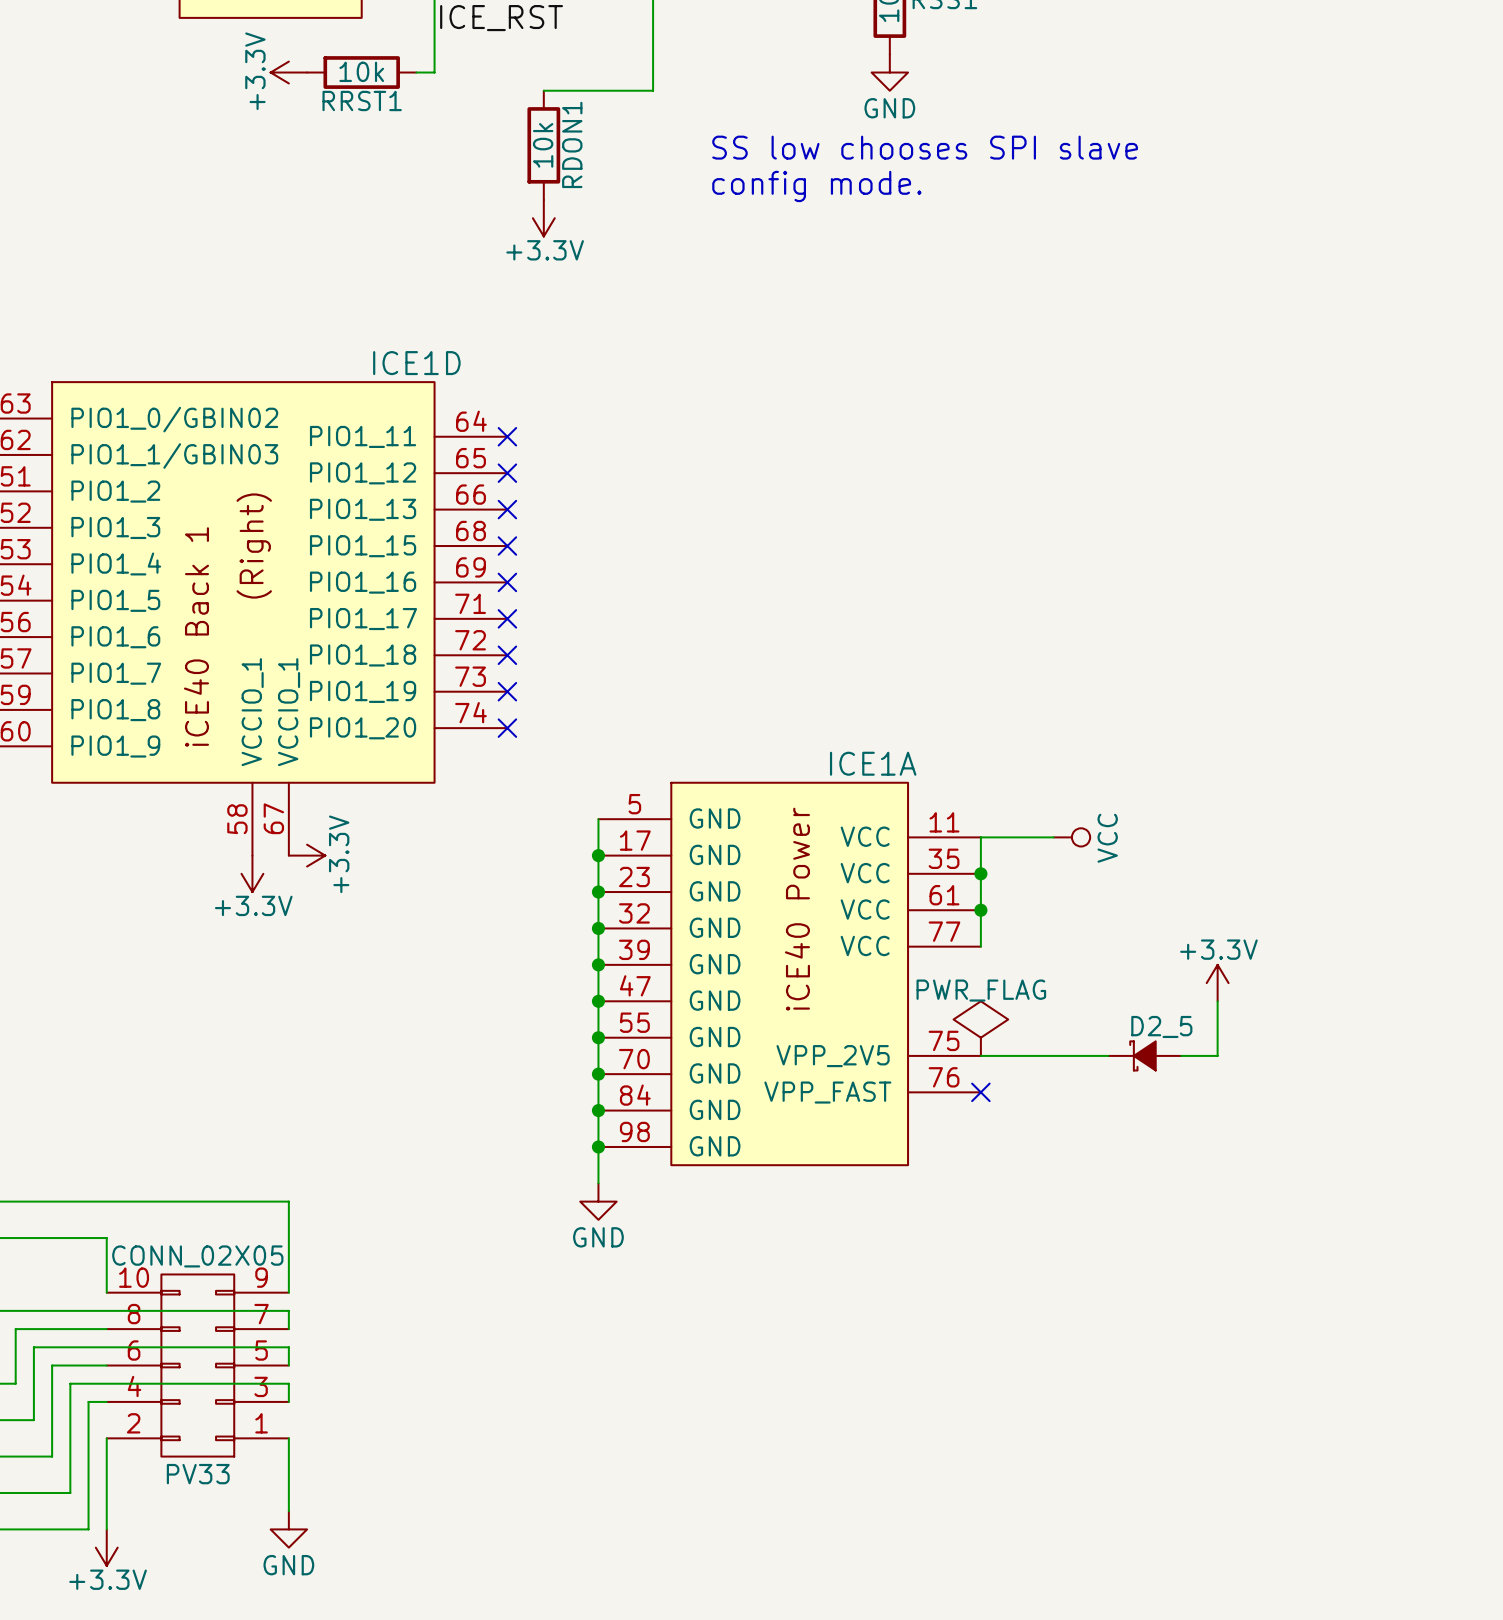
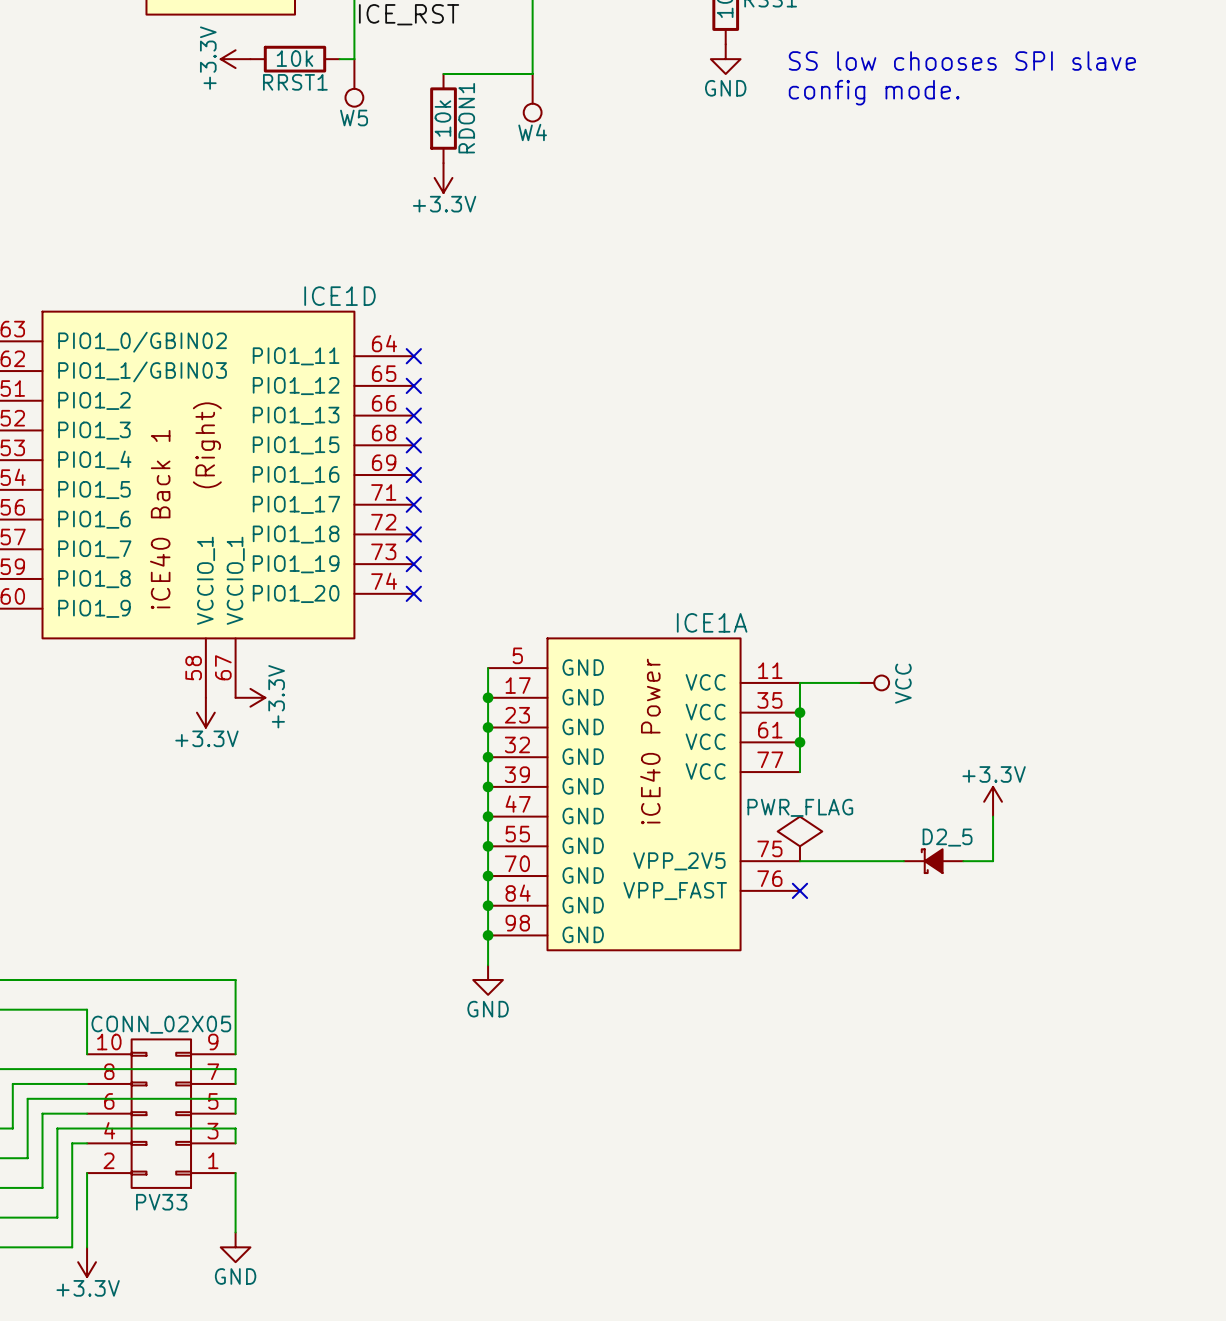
W5: none -> (354, 82)
W4: none -> (532, 97)
text position: SS low chooses SPI slave (925, 147) -> SS low chooses SPI slave (962, 60)
text position: config mode. (816, 186) -> config mode. (874, 92)

